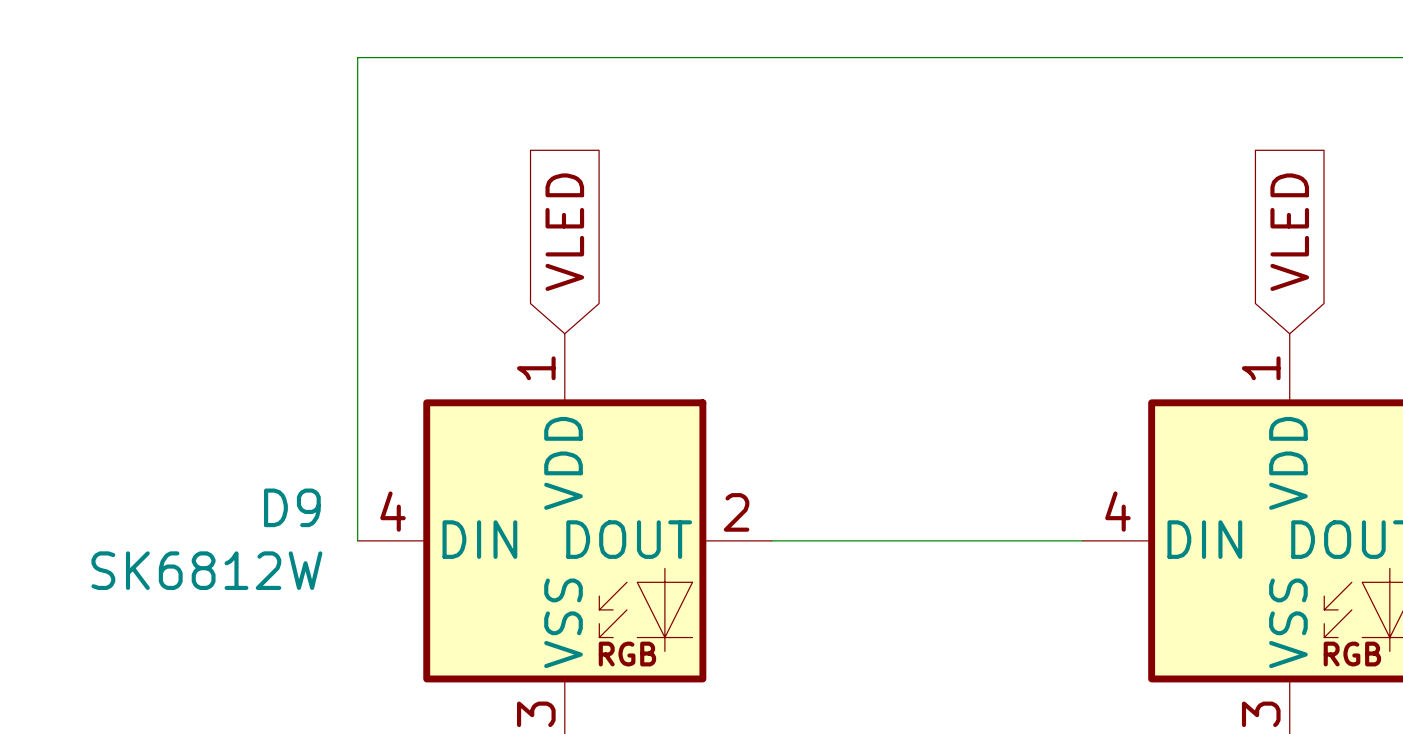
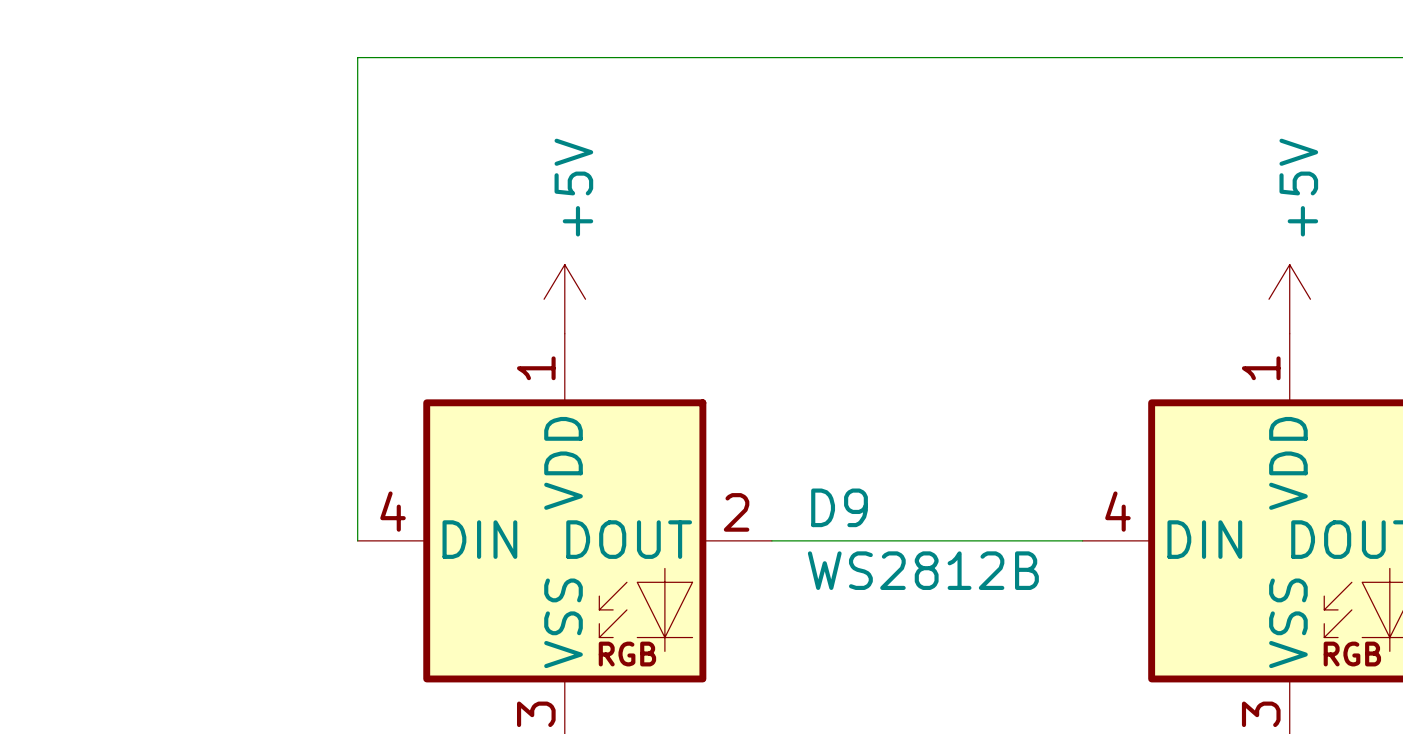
global label: VLED (564, 232) -> none
global label: VLED (1289, 232) -> none
power symbol: none -> +5V (564, 299)
power symbol: none -> +5V (1289, 299)
D9 name position: D9 (292, 507) -> D9 (839, 507)
D9 value: SK6812W (206, 570) -> WS2812B (923, 570)

